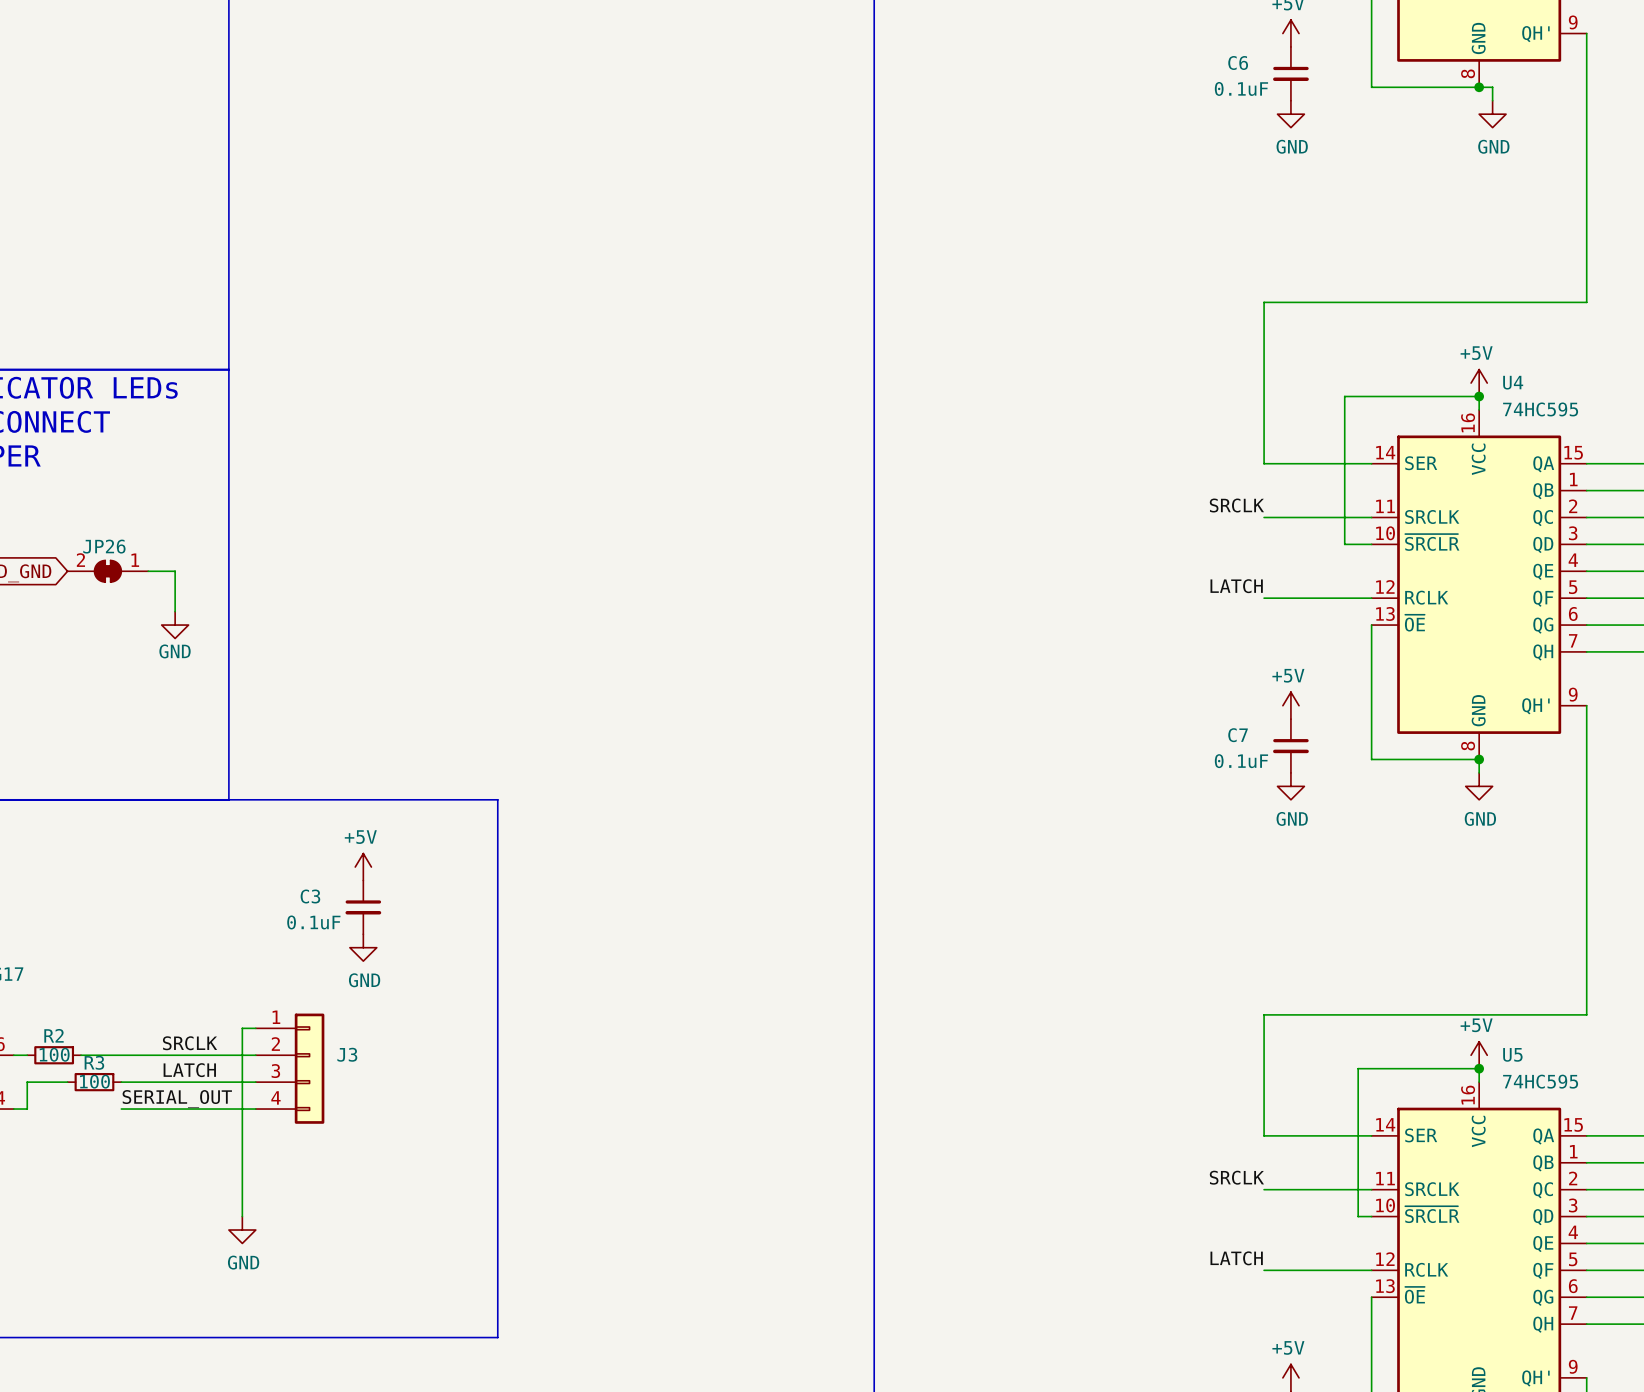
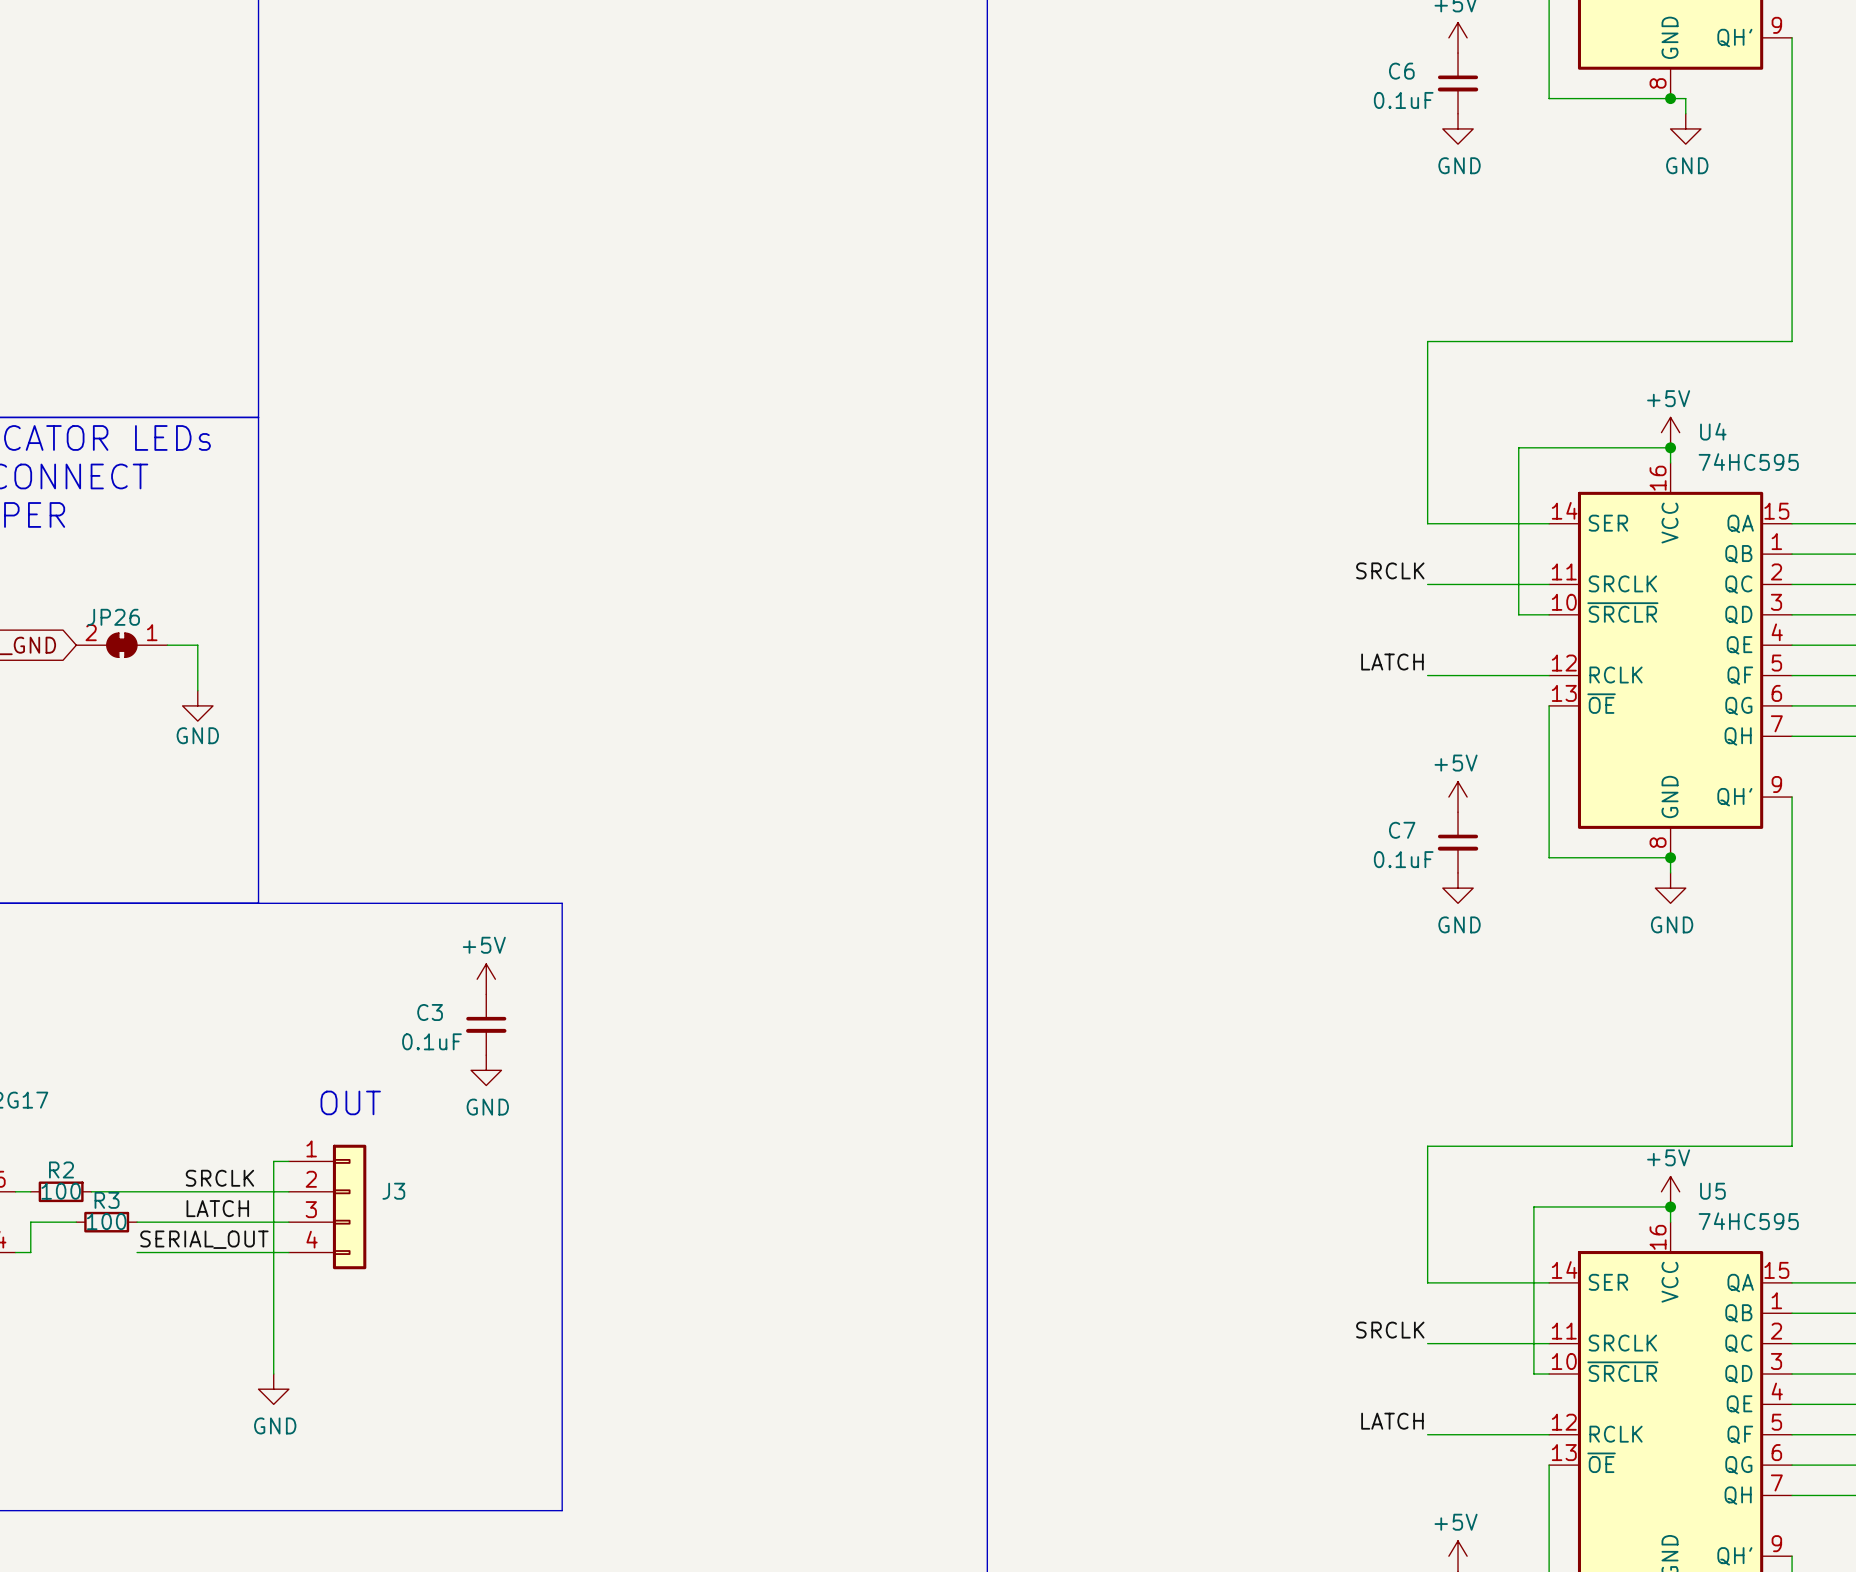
power symbol position: +5V (363, 867) -> +5V (486, 979)
C3 position: (363, 907) -> (486, 1024)
power symbol position: GND (363, 947) -> GND (486, 1070)
text: none -> OUT (350, 1102)

